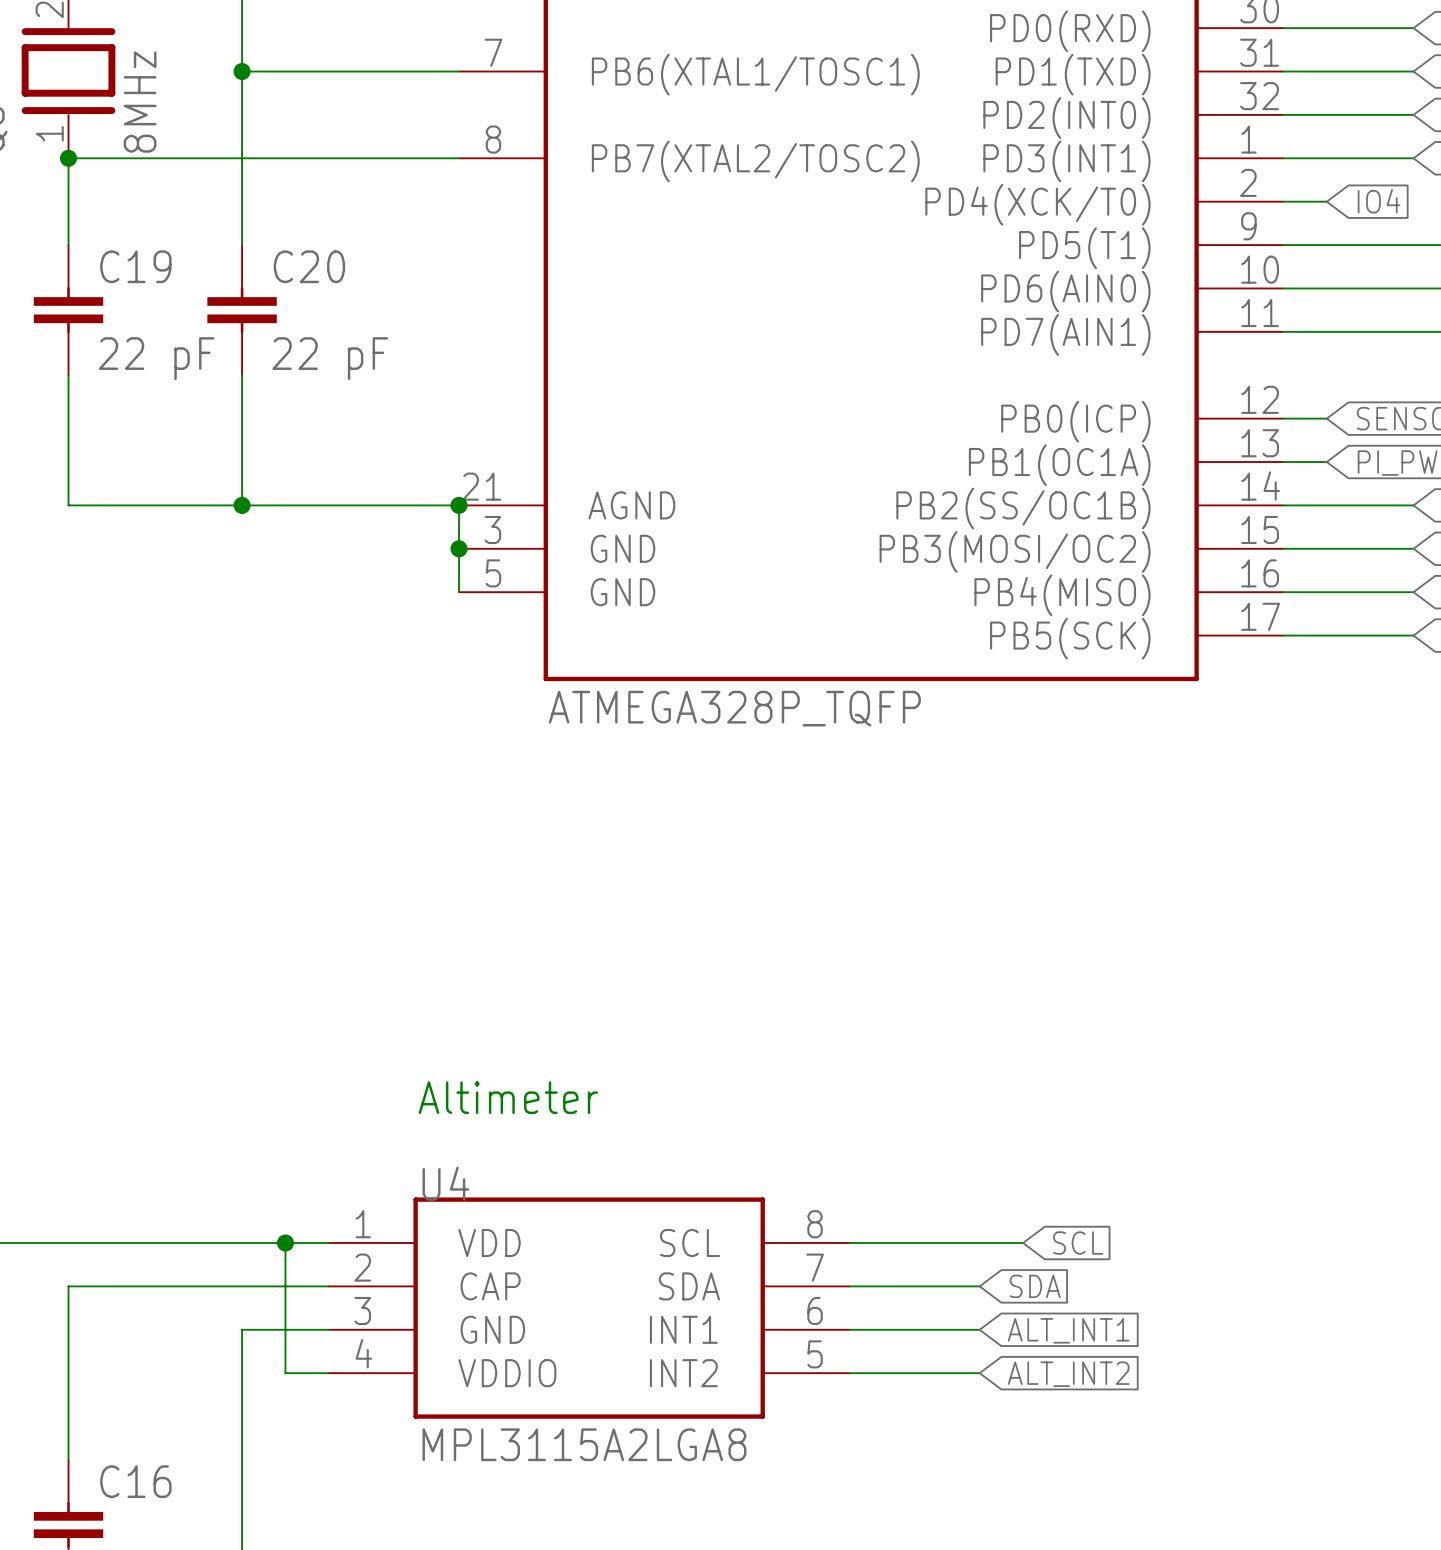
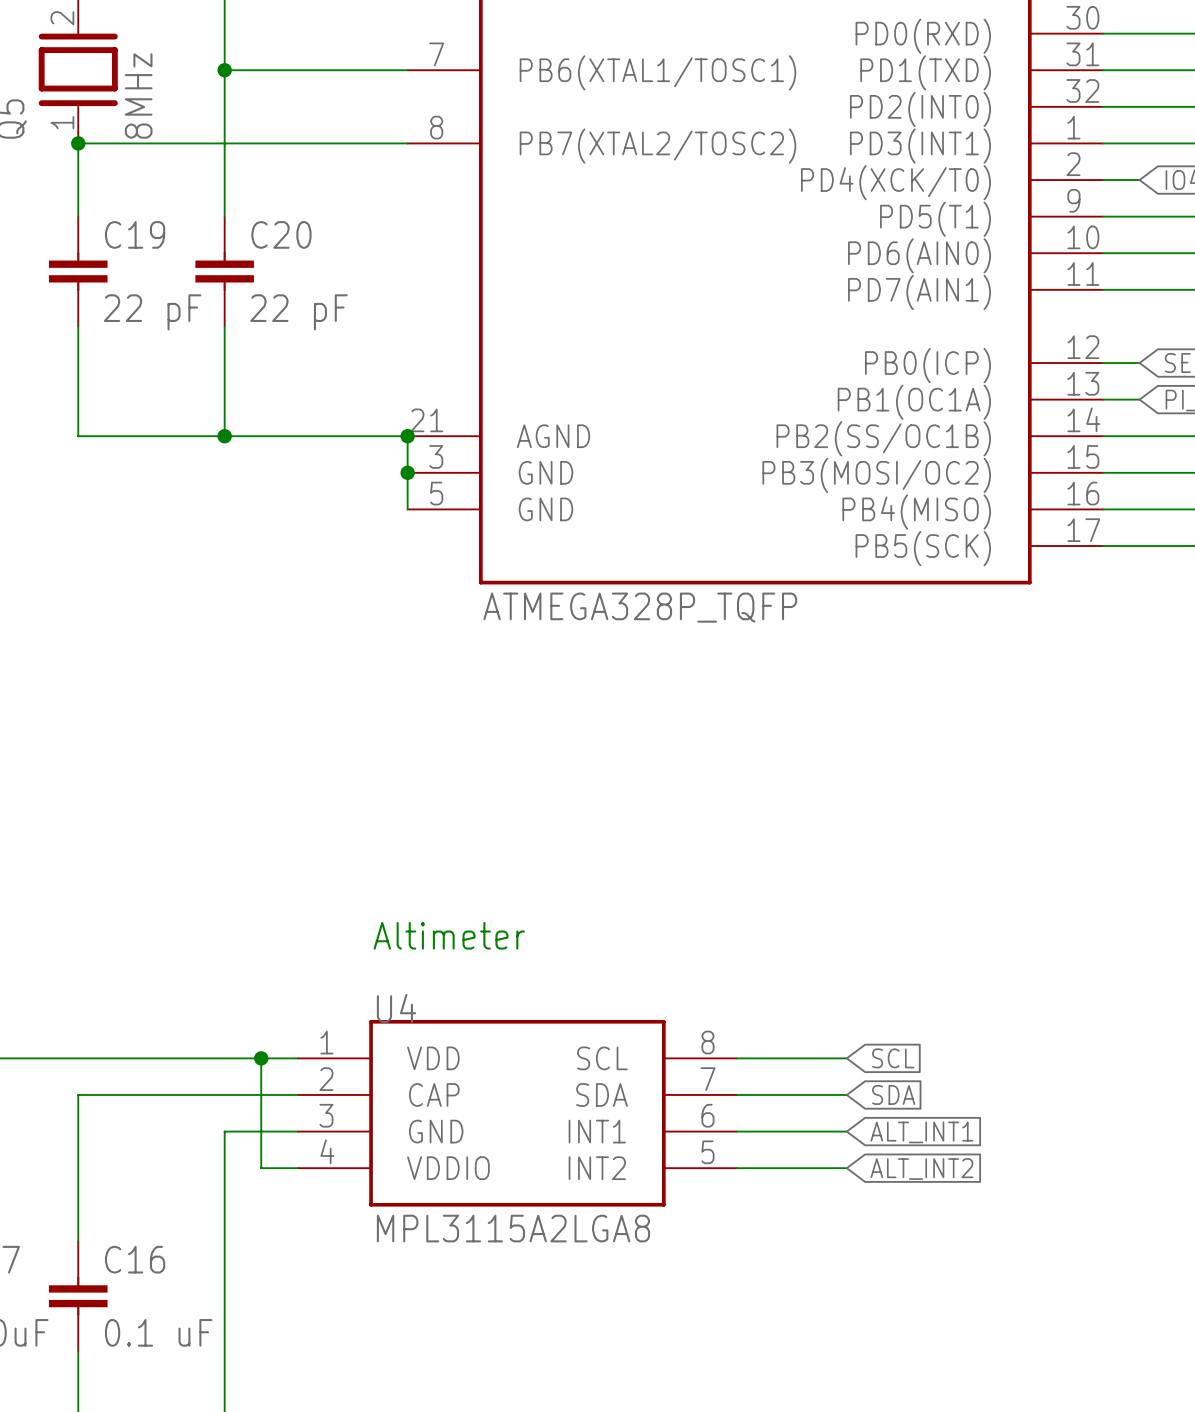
wire: (979, 1243) (1023, 1243) -> none
global label position: SCL (1078, 1243) -> SCL (893, 1058)

